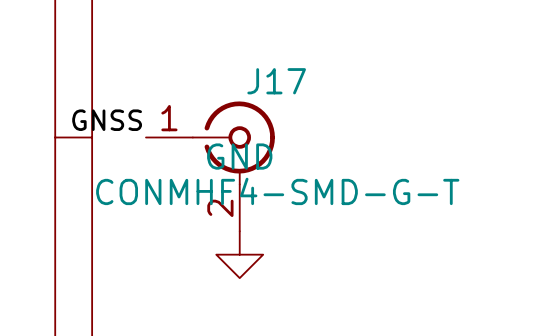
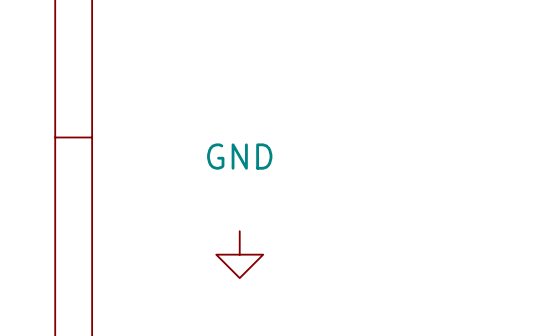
label: GNSS (107, 120) -> none
J17: CONMHF4-SMD-G-T (210, 166) -> none

